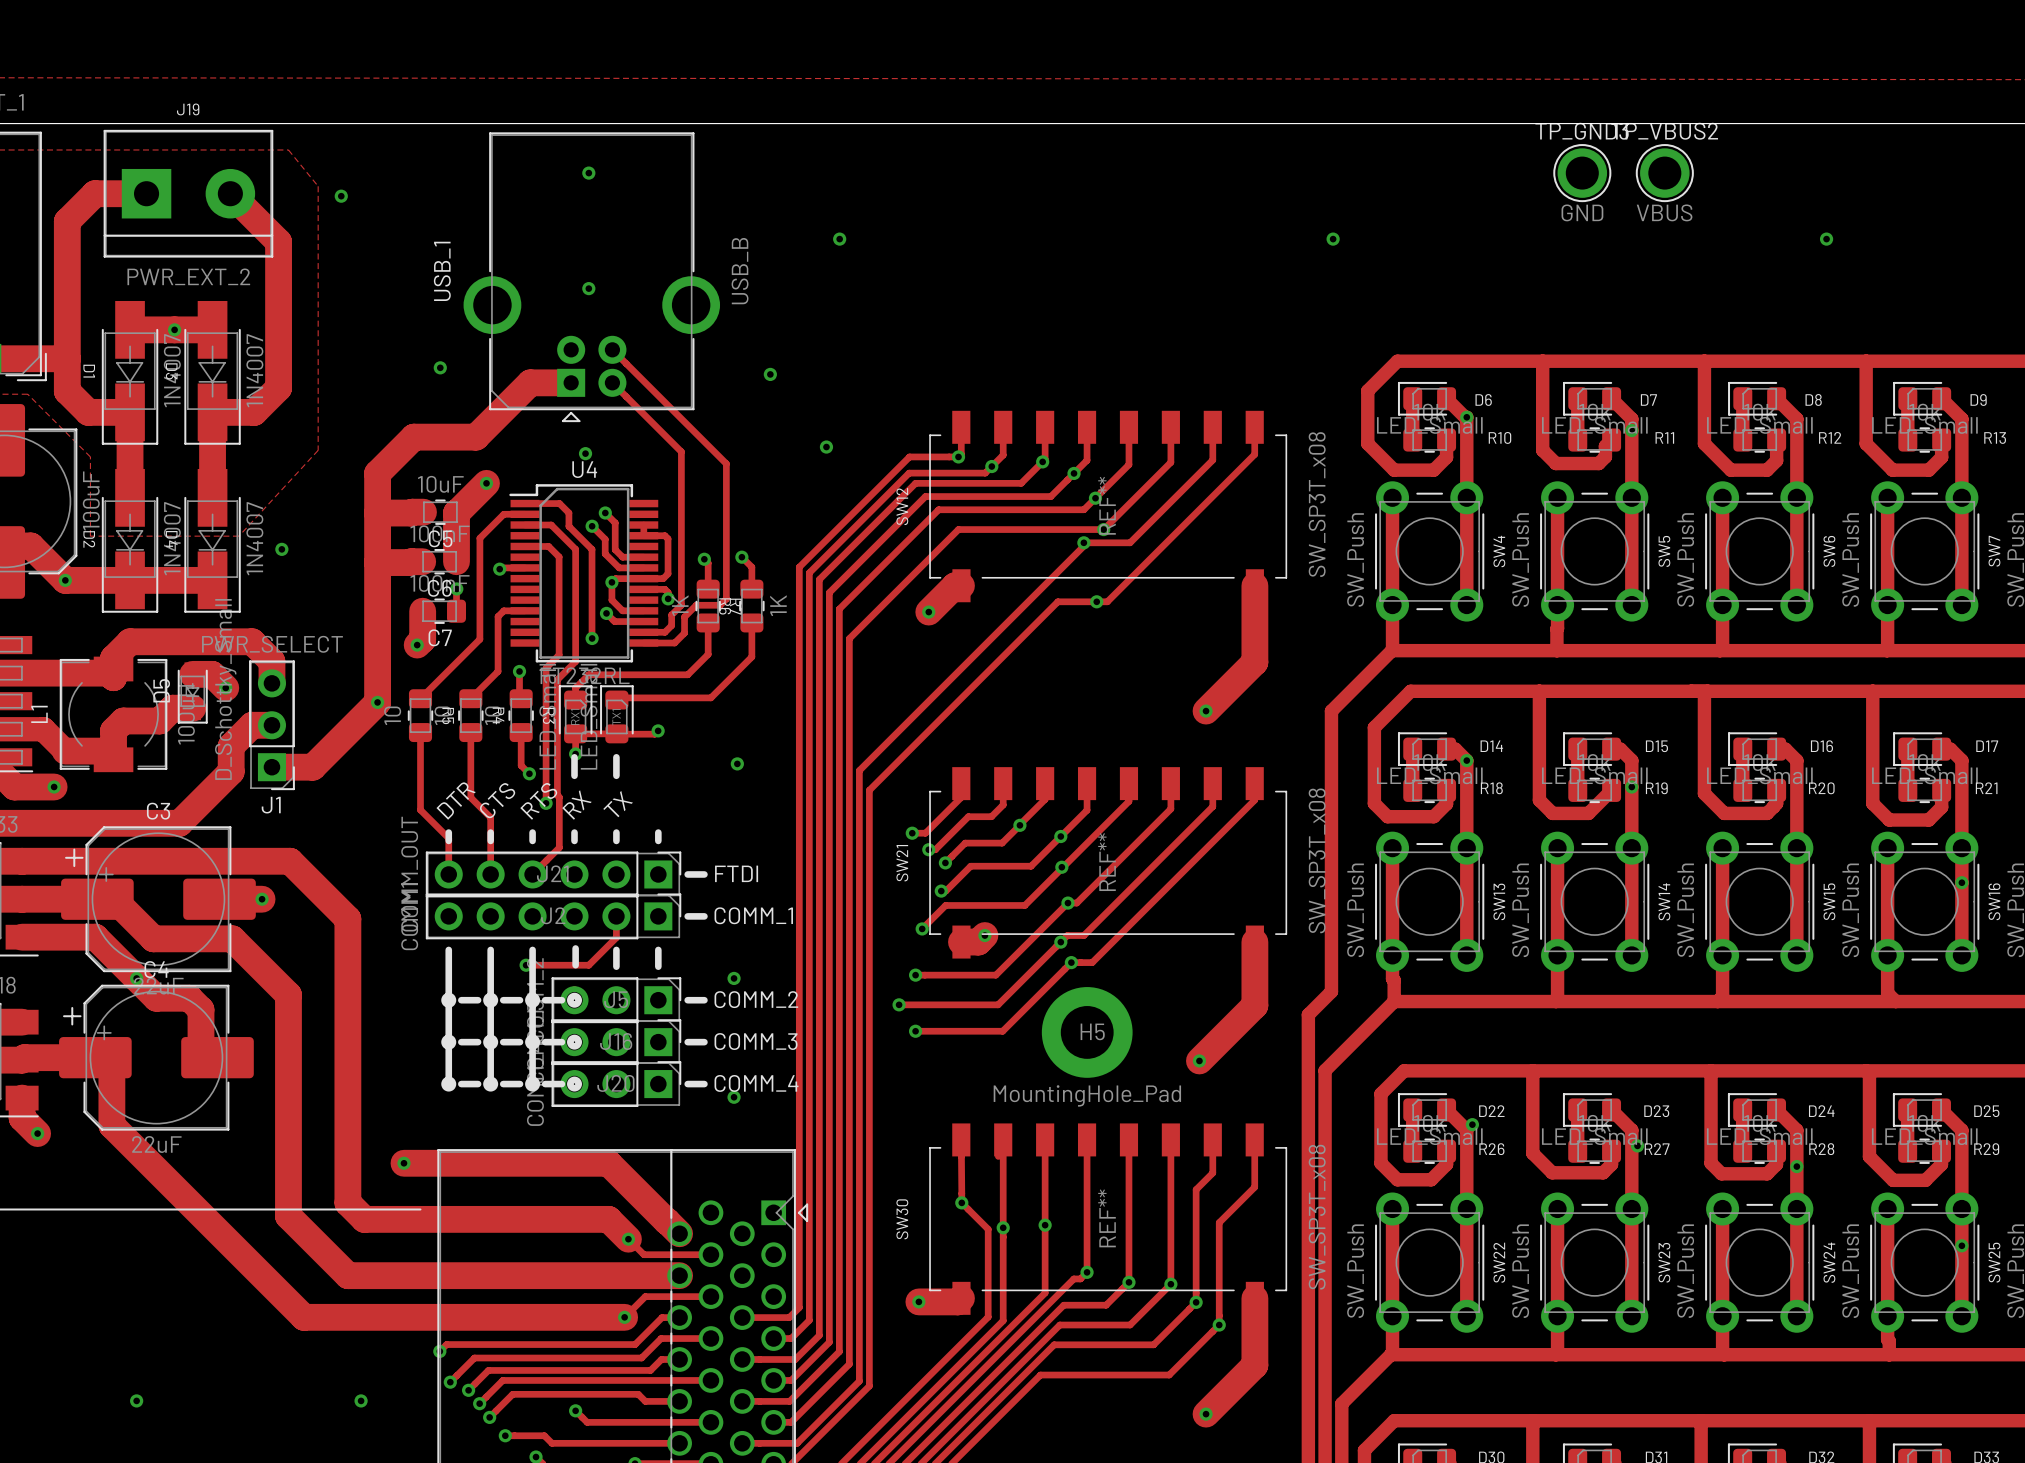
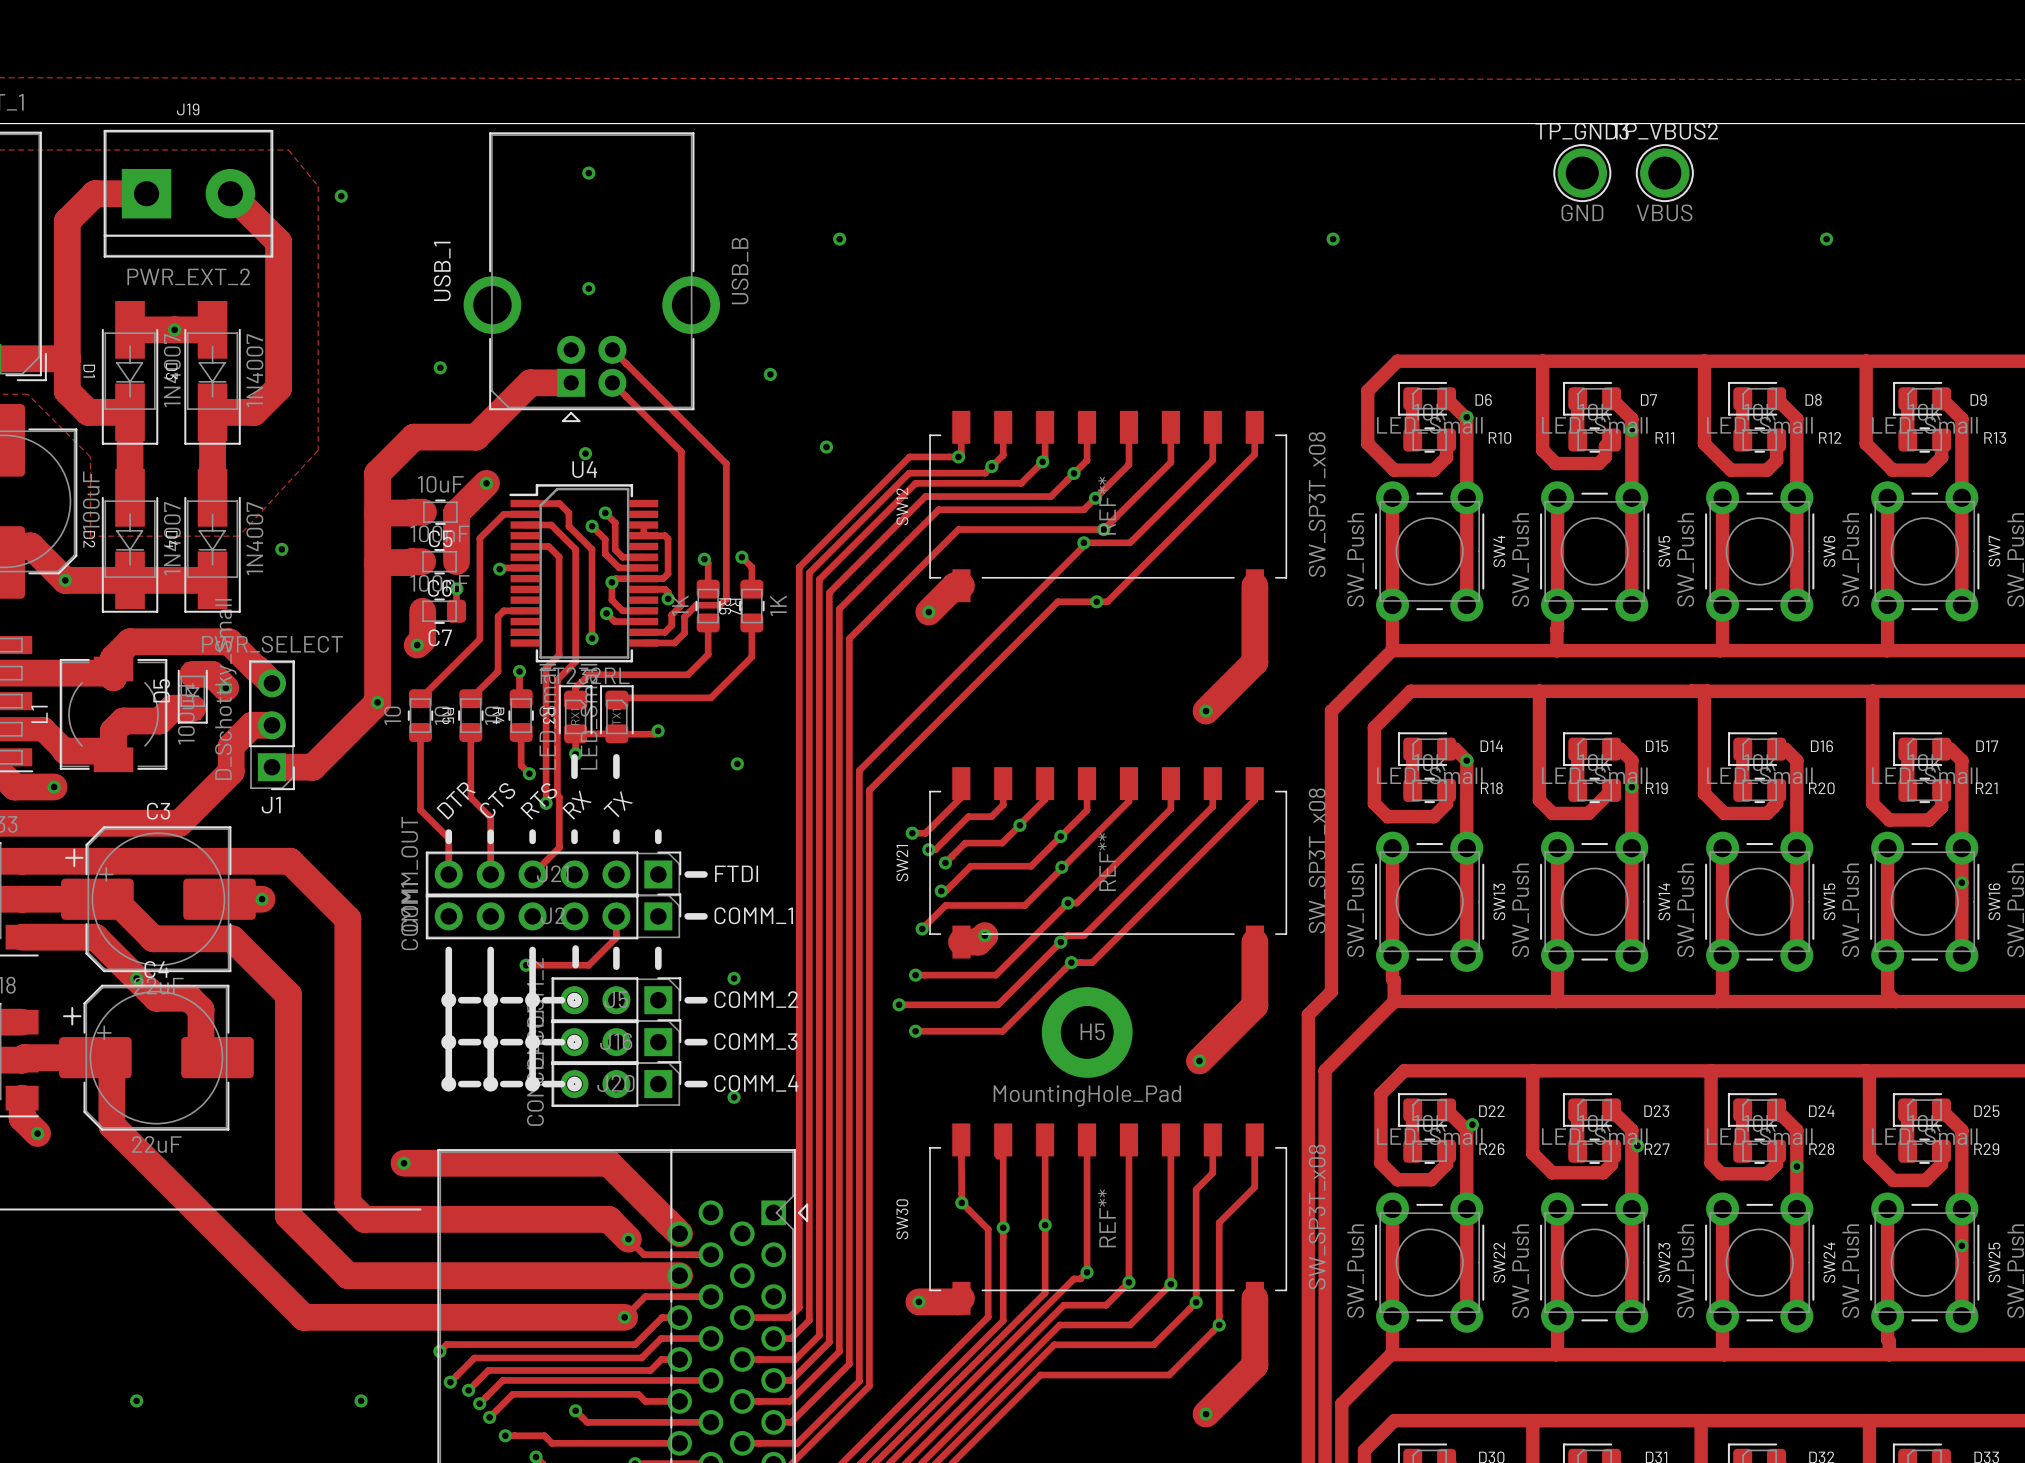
track: (229, 641) (252, 641) (271, 661) (271, 683) -> (229, 641) (271, 683)

